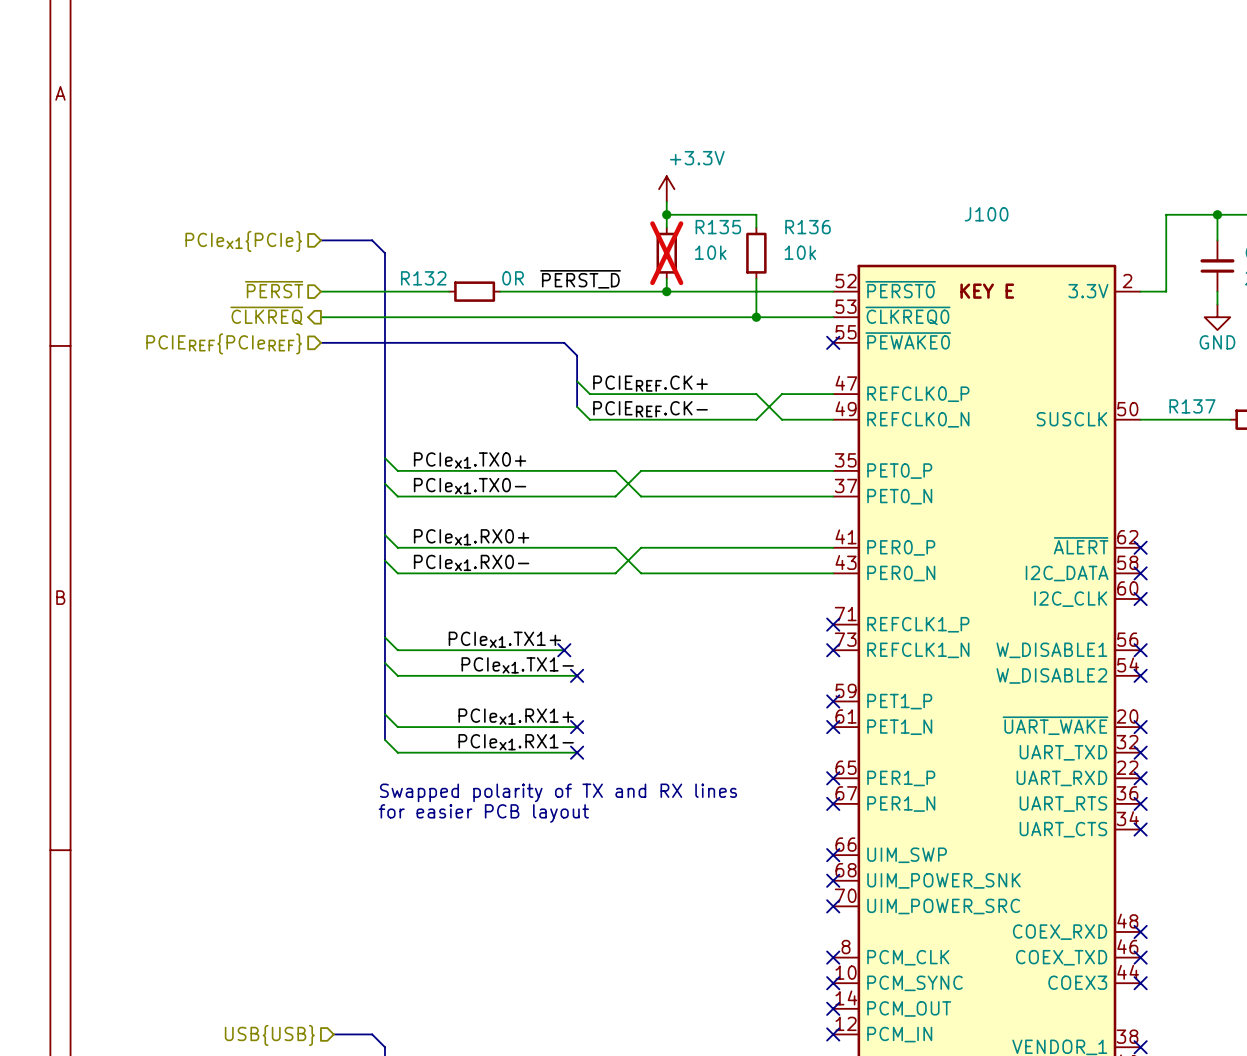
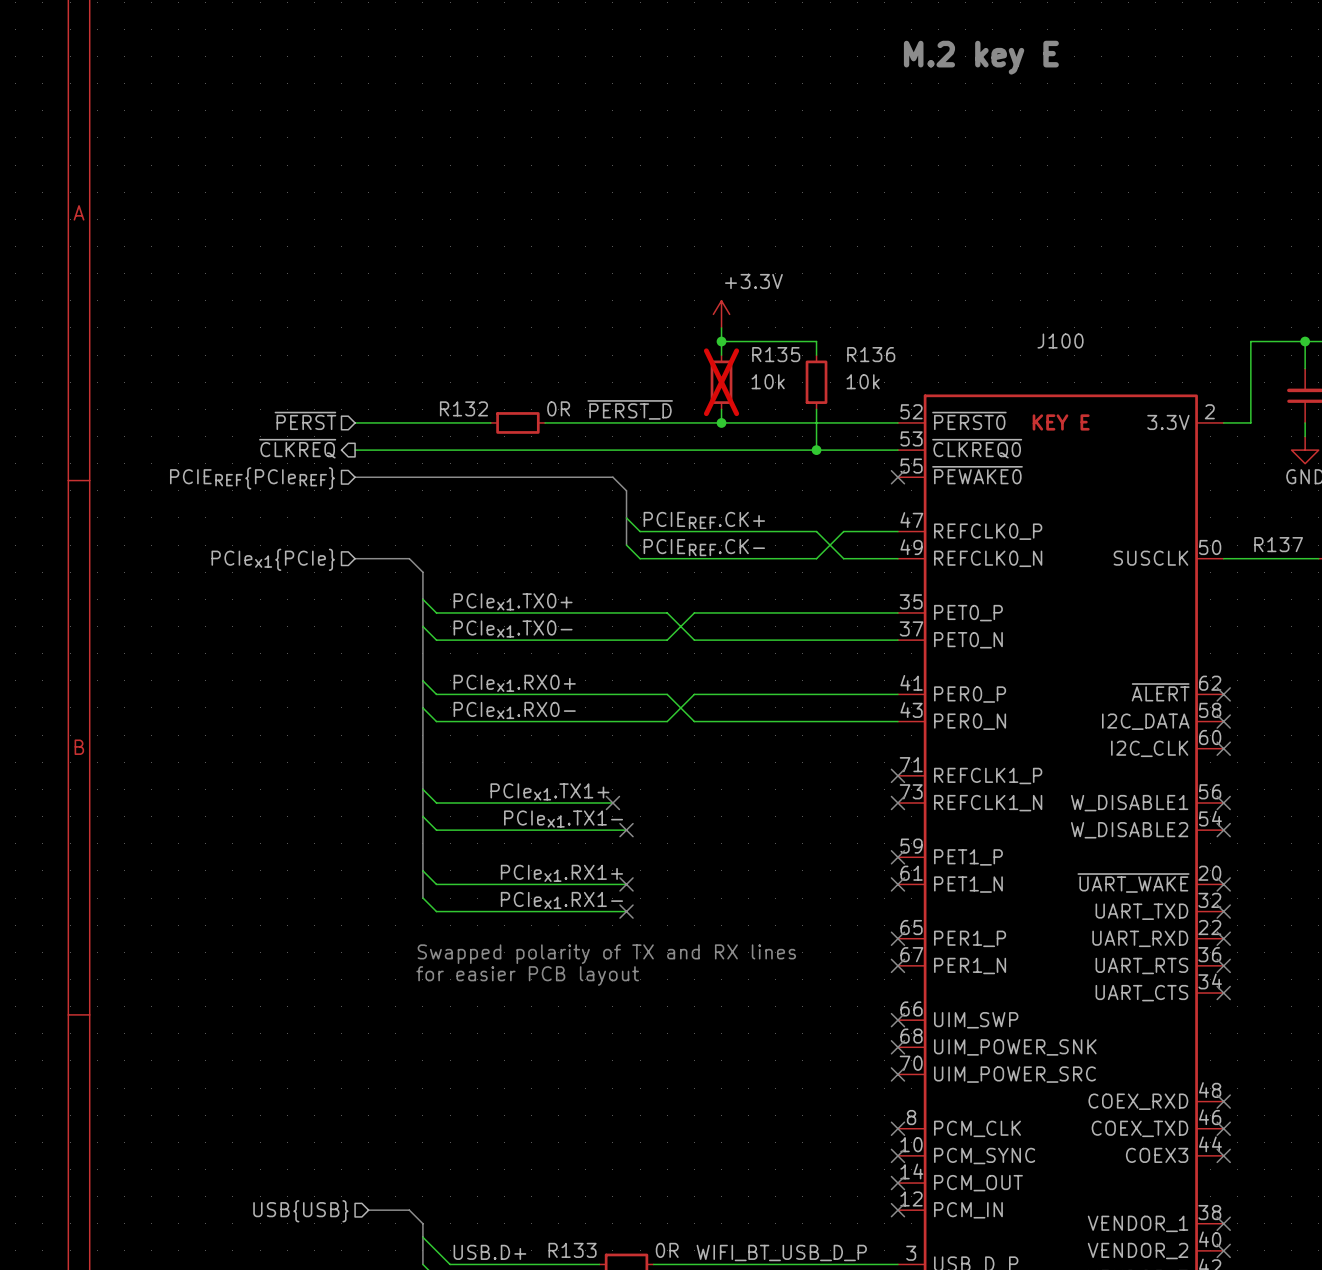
bus: (320, 240) (372, 240) (384, 253) (384, 432) -> (355, 558) (409, 558) (422, 572)
hierarchical label position: PCIex1{PCIe} (243, 241) -> PCIex1{PCIe} (273, 559)

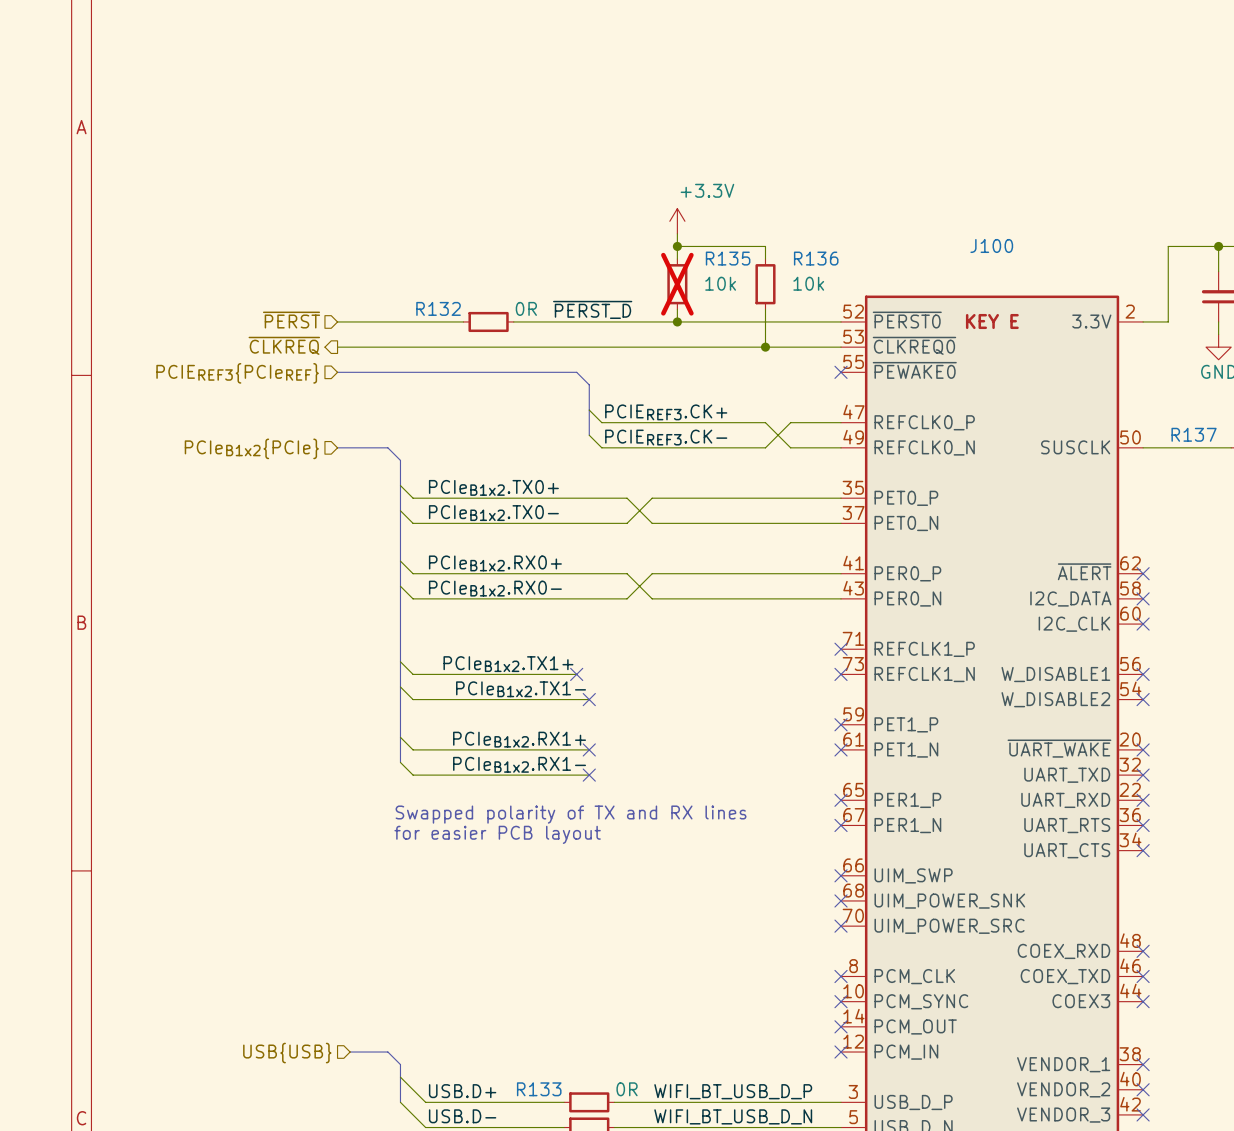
hierarchical label: PCIEREF{PCIeREF} (252, 478) -> PCIEREF3{PCIeREF} (237, 373)
label: PCIEREF.CK+ (704, 520) -> PCIEREF3.CK+ (666, 412)
label: PCIEREF.CK- (704, 547) -> PCIEREF3.CK- (666, 437)
hierarchical label: PCIex1{PCIe} (273, 559) -> PCIeB1x2{PCIe} (251, 448)
label: PCIex1.TX0+ (513, 601) -> PCIeB1x2.TX0+ (493, 487)
label: PCIex1.TX0- (513, 629) -> PCIeB1x2.TX0- (493, 513)
label: PCIex1.RX0+ (514, 683) -> PCIeB1x2.RX0+ (495, 563)
label: PCIex1.RX0- (514, 710) -> PCIeB1x2.RX0- (495, 588)
label: PCIex1.TX1+ (549, 791) -> PCIeB1x2.TX1+ (508, 664)
label: PCIex1.TX1- (563, 819) -> PCIeB1x2.TX1- (521, 689)
label: PCIex1.RX1+ (561, 873) -> PCIeB1x2.RX1+ (519, 739)
label: PCIex1.RX1- (561, 900) -> PCIeB1x2.RX1- (519, 764)

